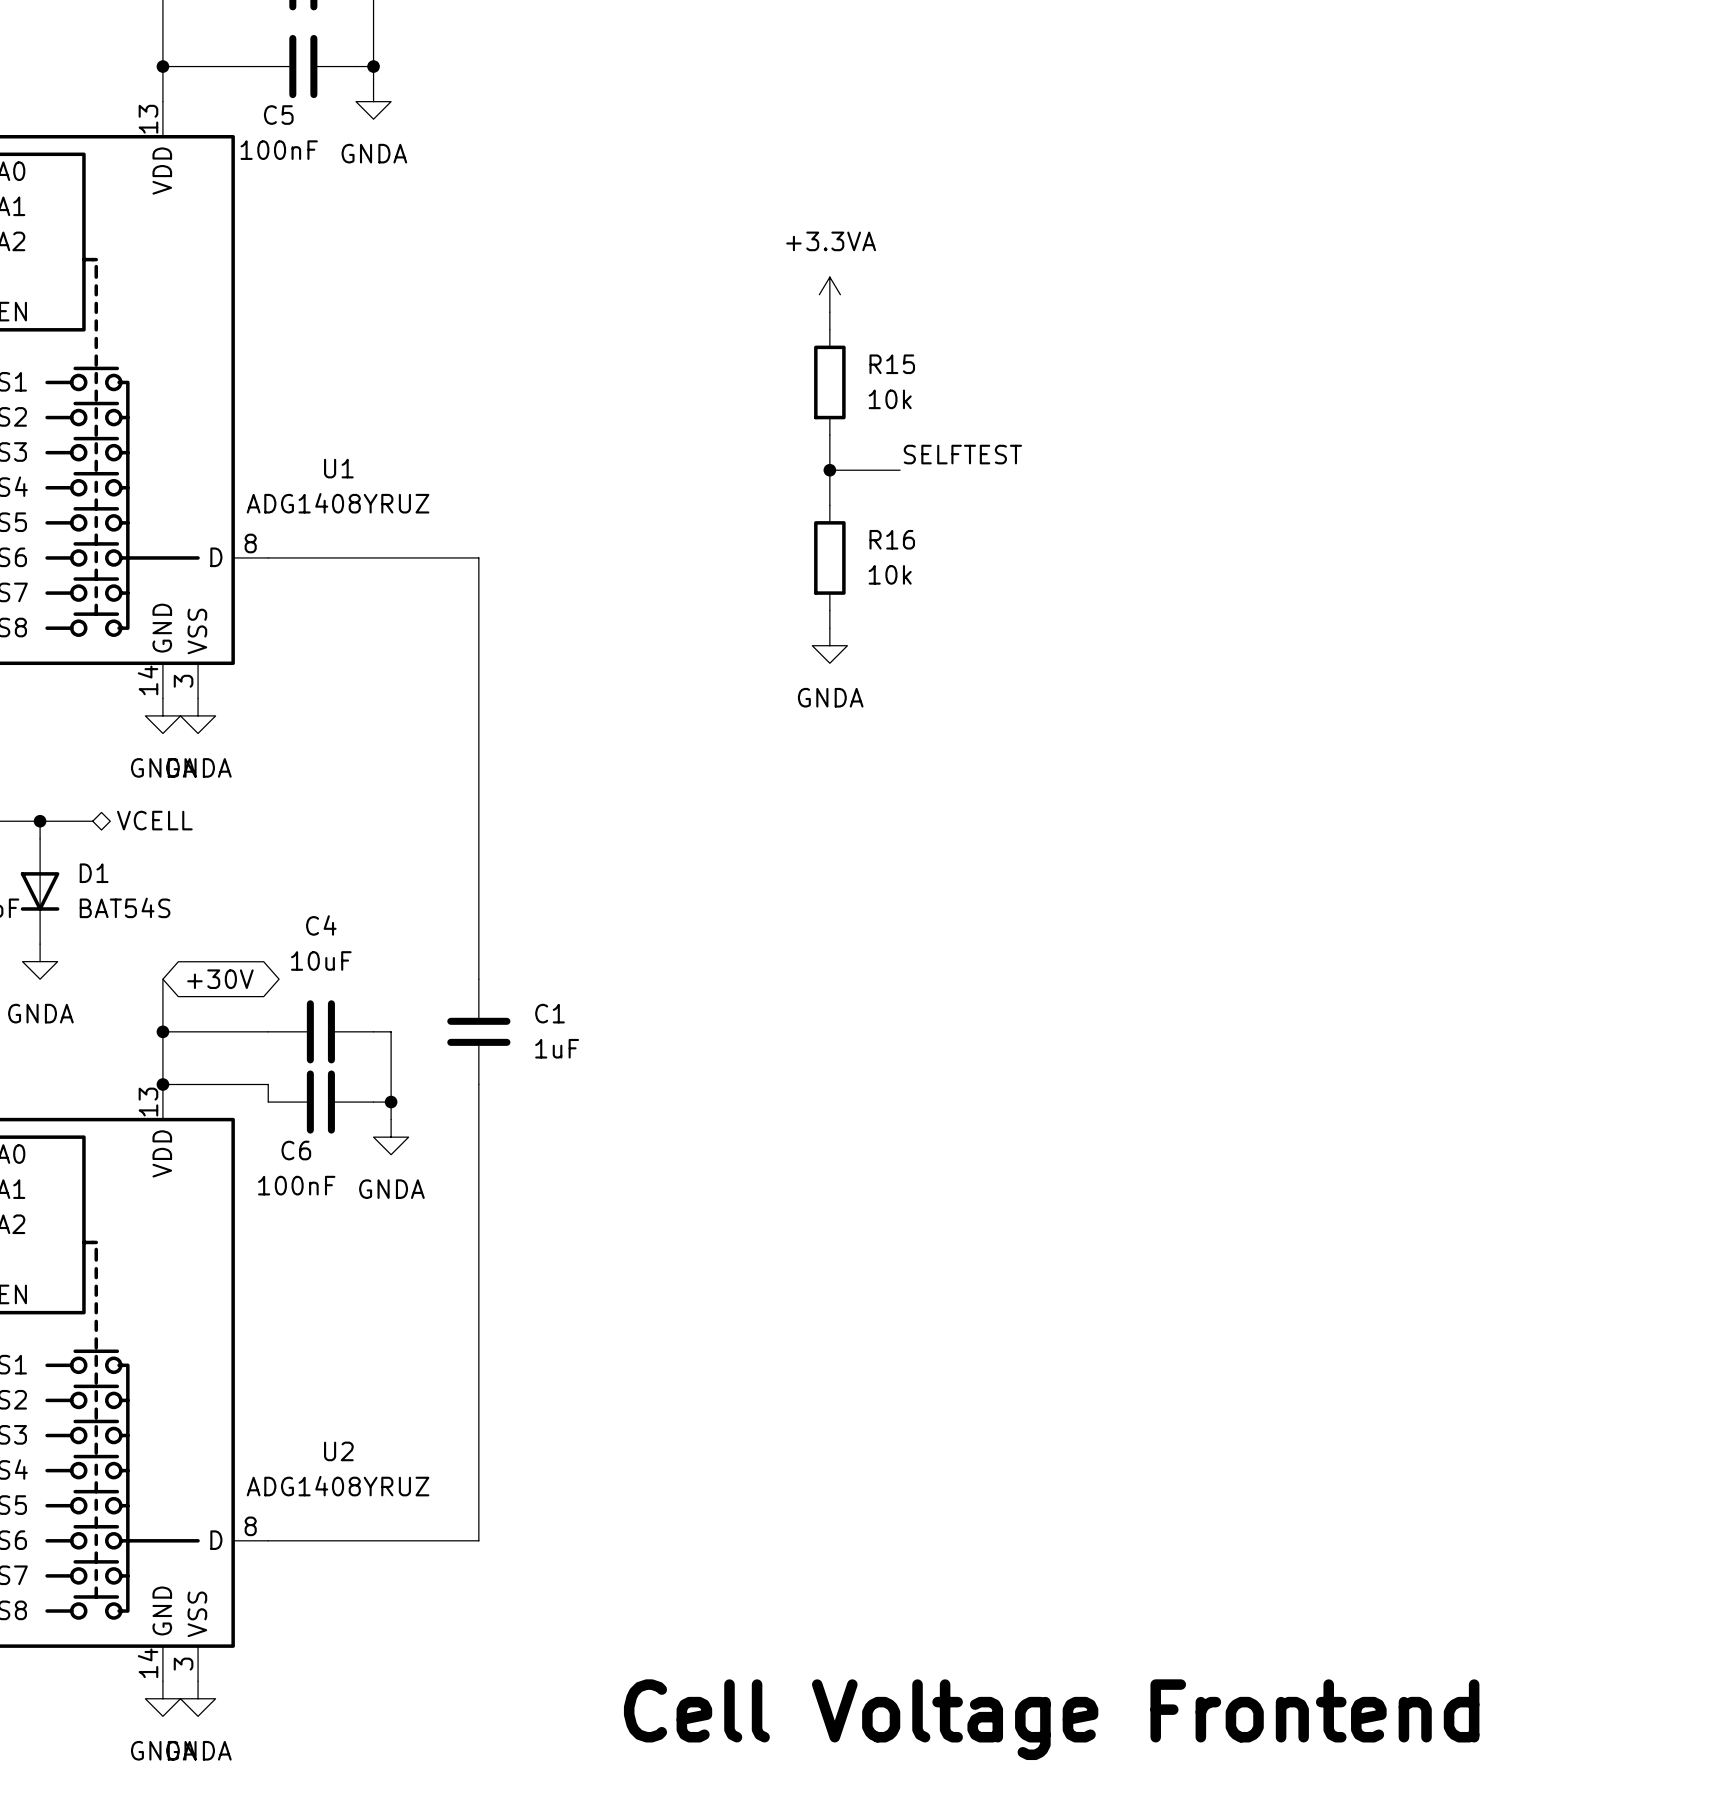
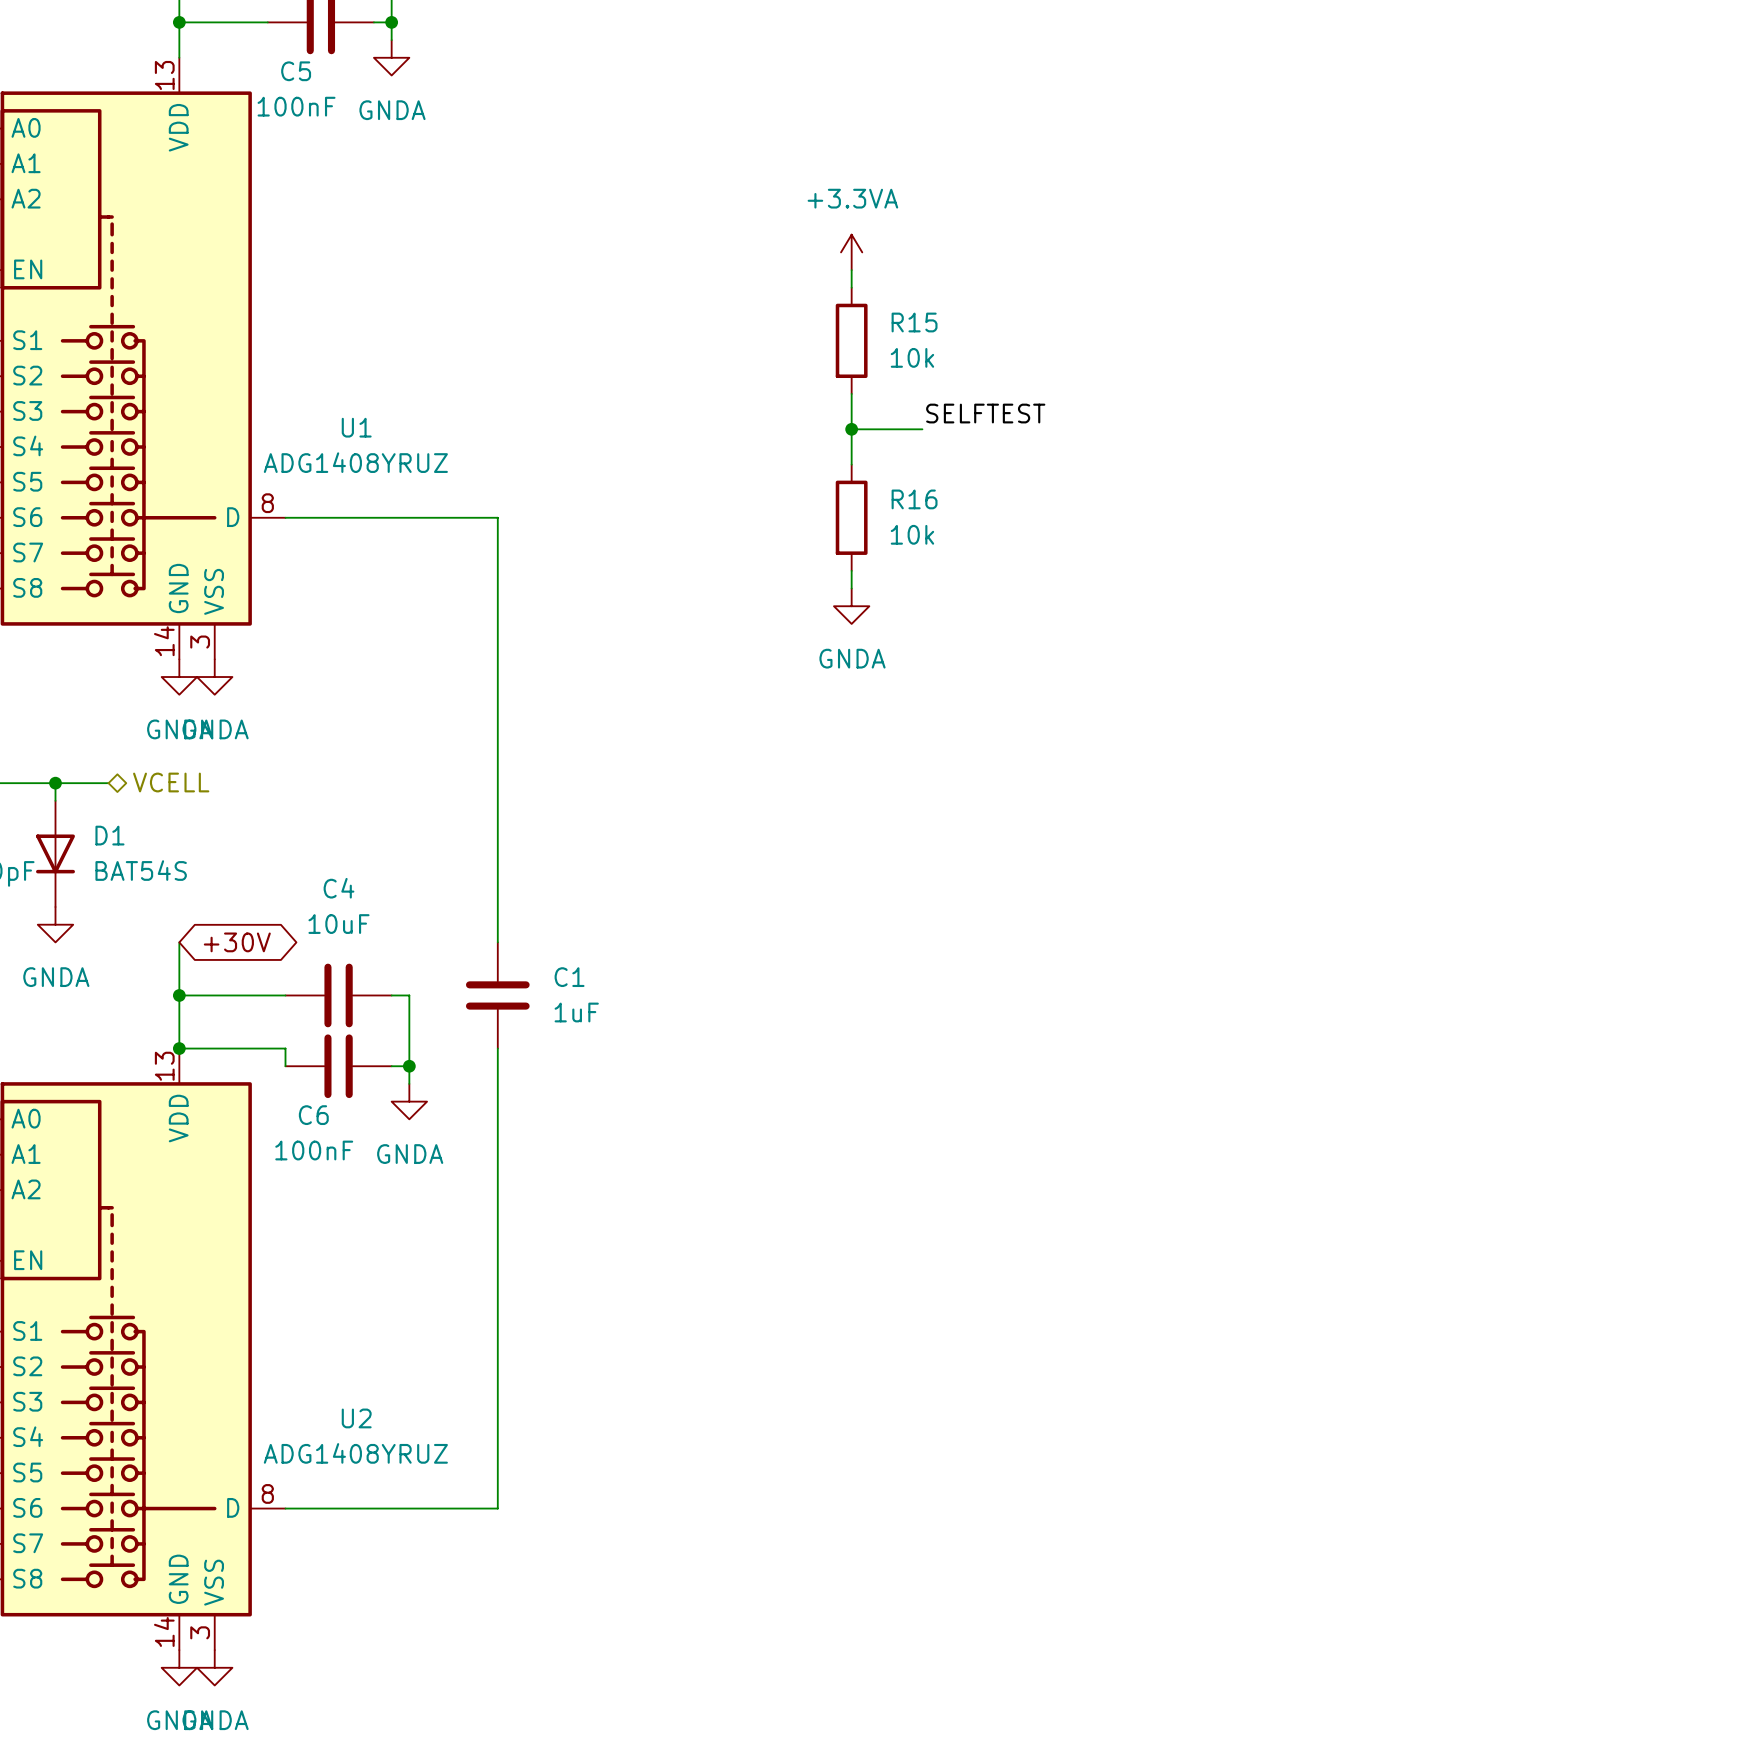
text: Cell Voltage Frontend (1051, 1719) -> none

